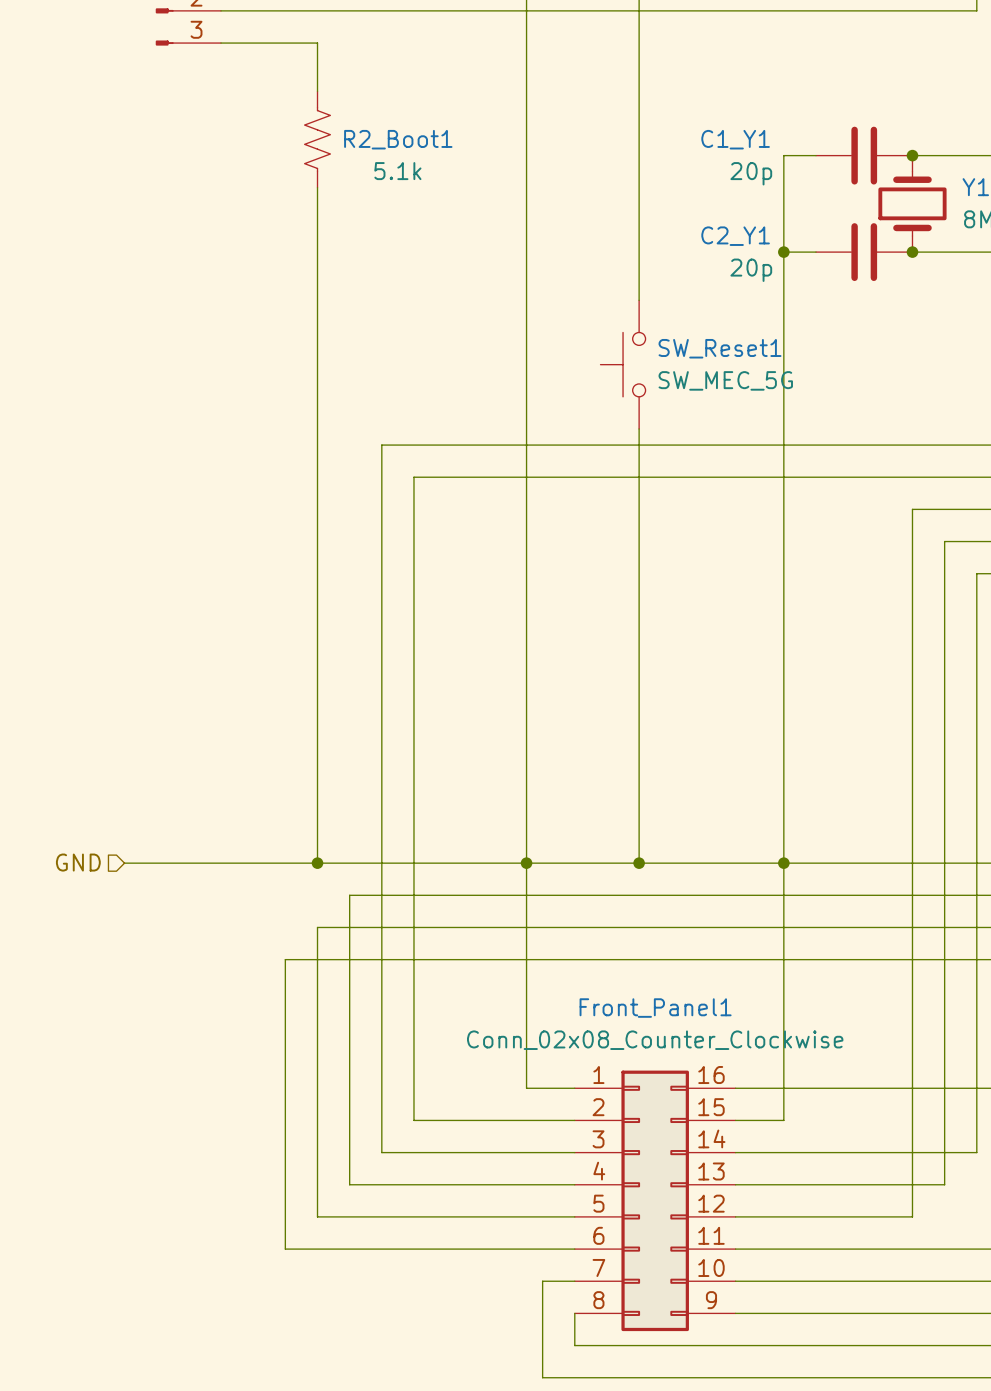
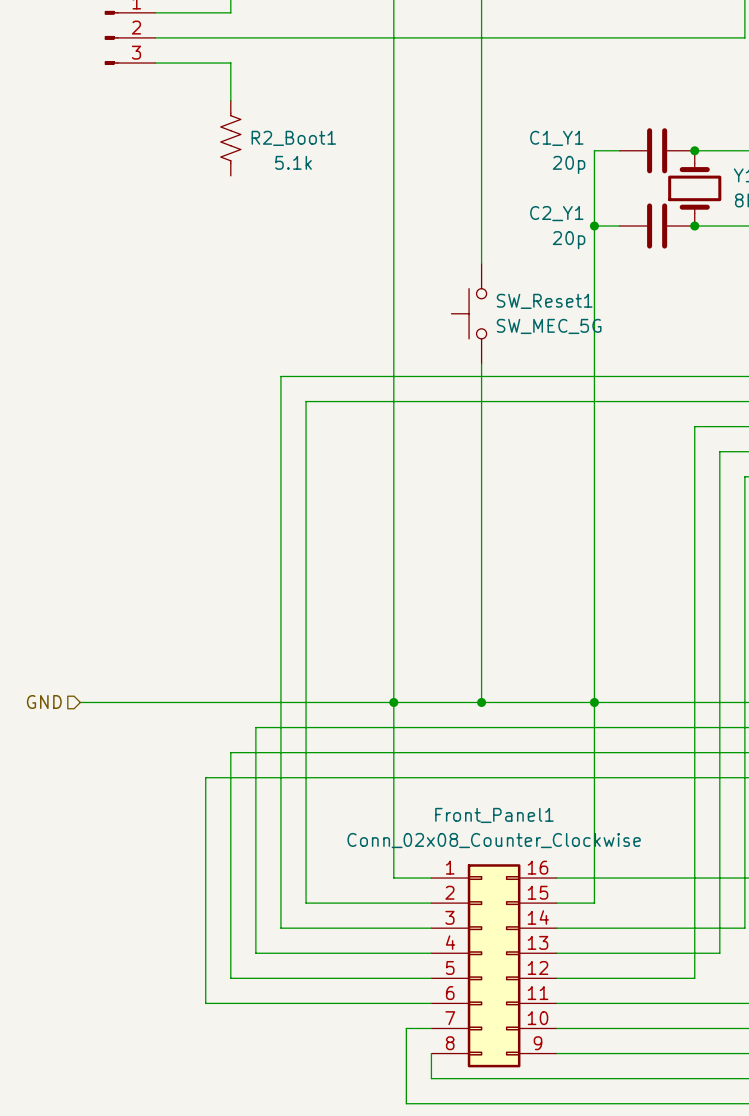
wire: (317, 187) (317, 863) -> none
junction: (317, 863) -> none

